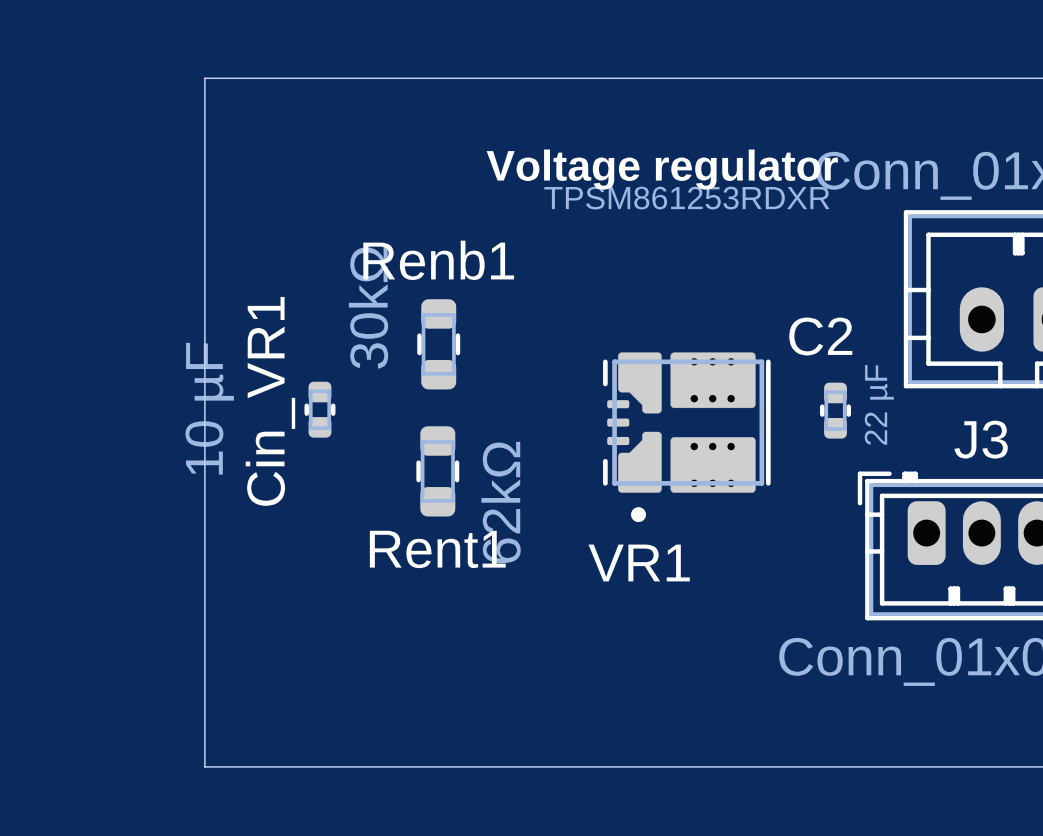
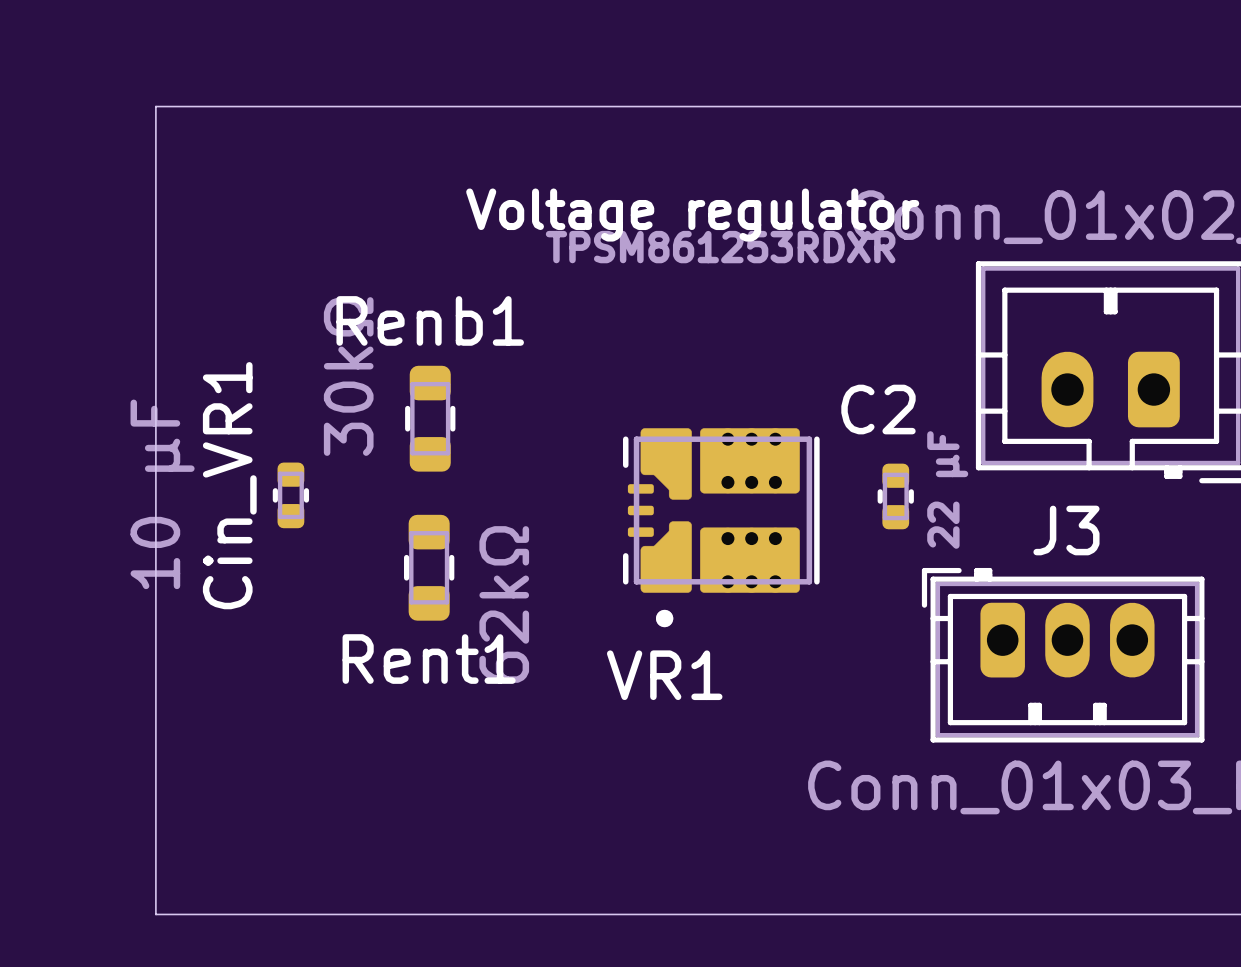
VR1 footprint: [603, 352, 771, 523] -> [622, 428, 820, 628]

